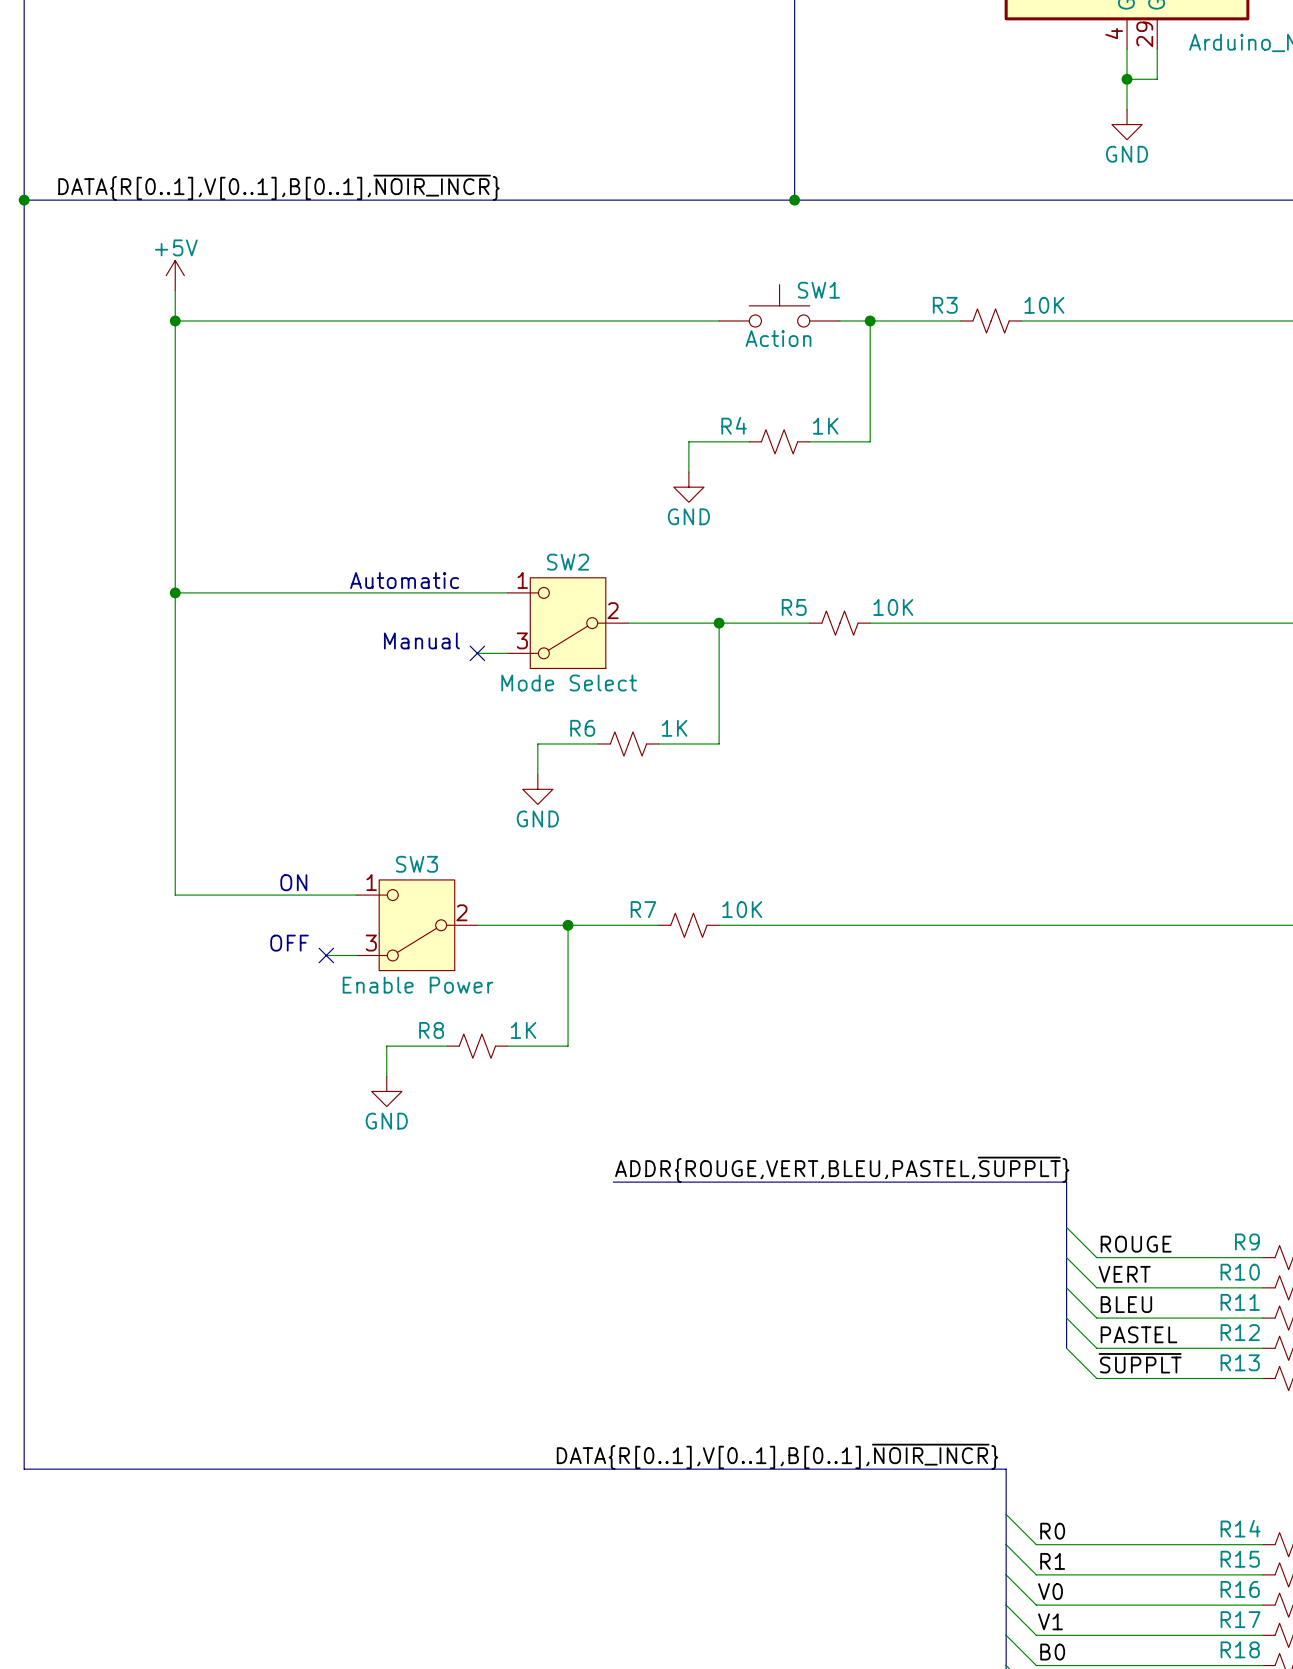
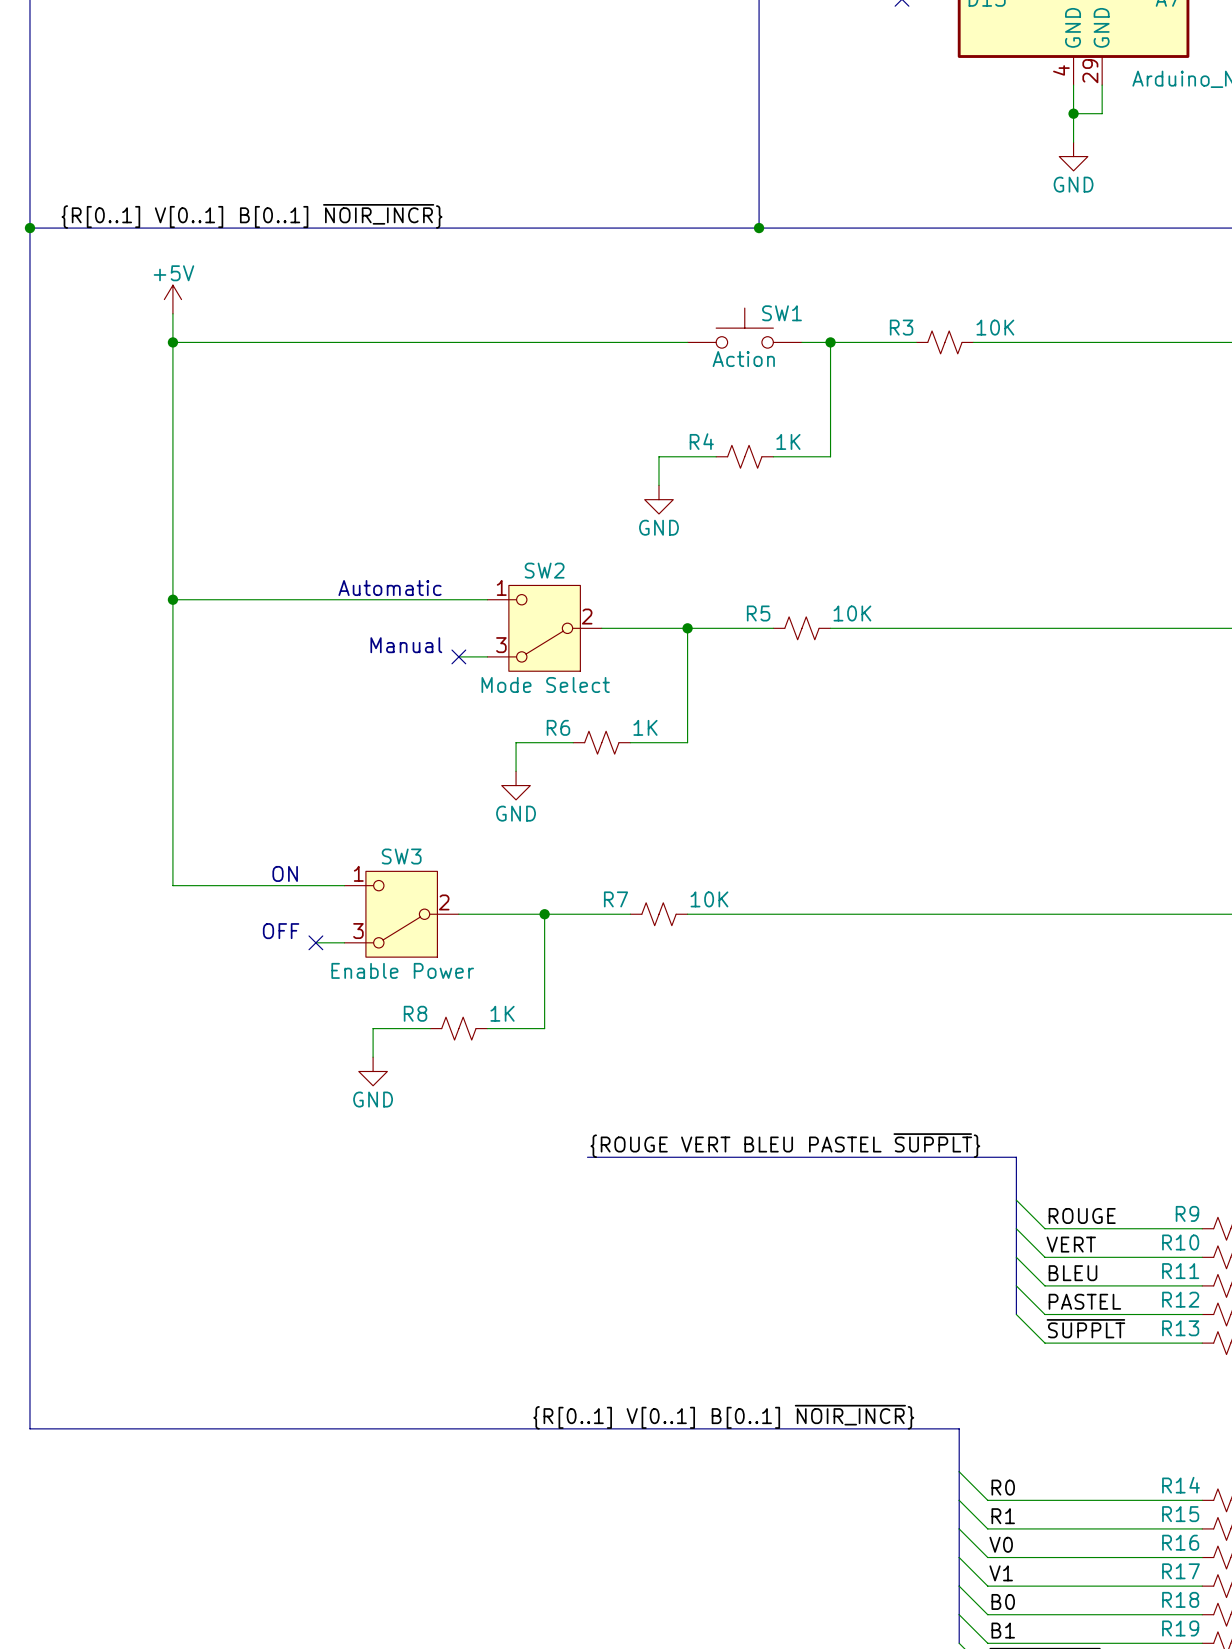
label: DATA{R[0..1],V[0..1],B[0..1],~{NOIR_INCR}} (278, 187) -> {R[0..1] V[0..1] B[0..1] ~{NOIR_INCR}} (252, 216)
label: ADDR{ROUGE,VERT,BLEU,PASTEL,~{SUPPLT}} (842, 1169) -> {ROUGE VERT BLEU PASTEL ~{SUPPLT}} (785, 1145)
label: DATA{R[0..1],V[0..1],B[0..1],~{NOIR_INCR}} (777, 1456) -> {R[0..1] V[0..1] B[0..1] ~{NOIR_INCR}} (723, 1417)

